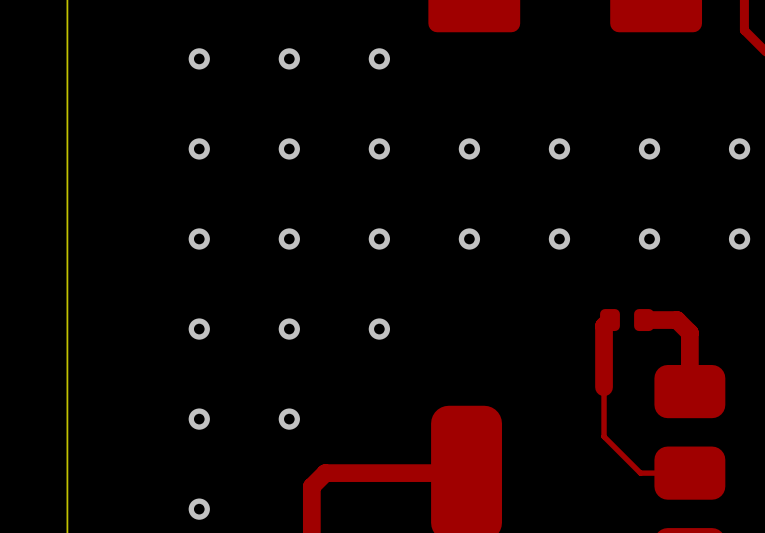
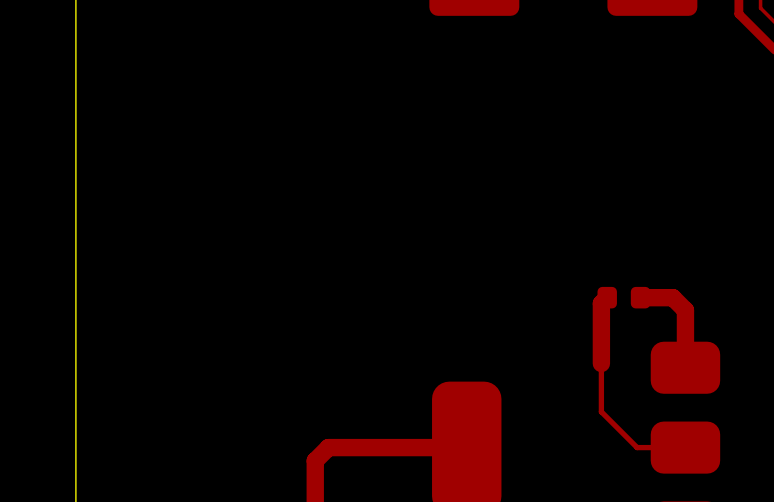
via: (199, 58) -> none
via: (289, 58) -> none
via: (379, 58) -> none
via: (199, 148) -> none
via: (289, 148) -> none
via: (379, 148) -> none
via: (469, 148) -> none
via: (559, 148) -> none
via: (649, 148) -> none
via: (739, 148) -> none
via: (199, 239) -> none
via: (289, 239) -> none
via: (379, 239) -> none
via: (469, 239) -> none
via: (559, 239) -> none
via: (649, 239) -> none
via: (739, 239) -> none
via: (199, 329) -> none
via: (289, 329) -> none
via: (379, 329) -> none
via: (199, 419) -> none
via: (289, 419) -> none
via: (199, 509) -> none

